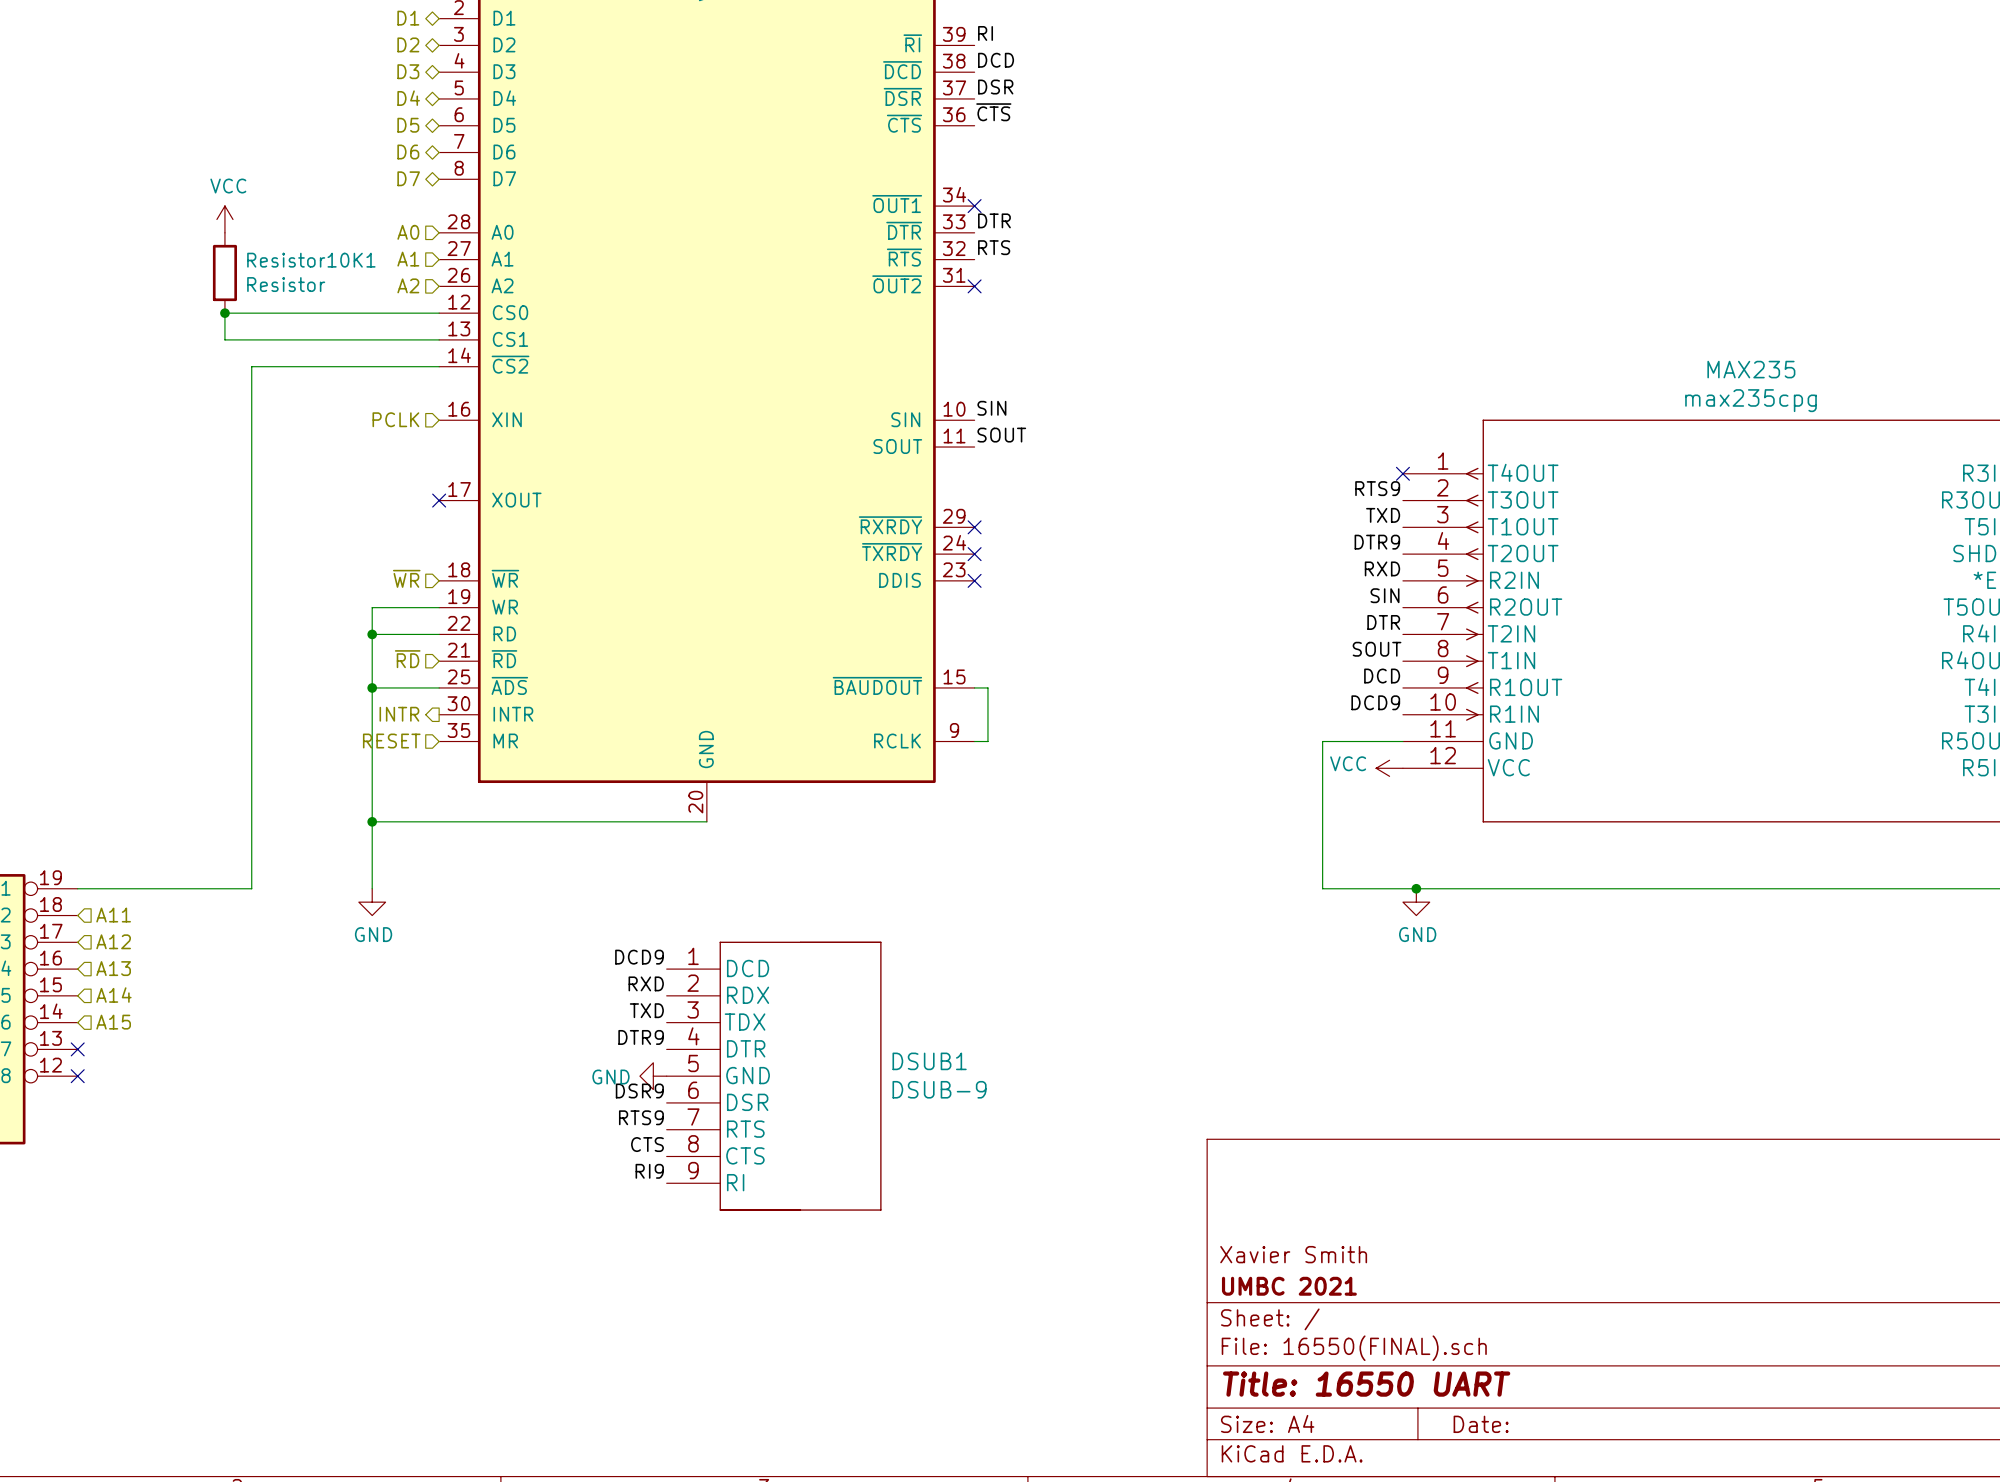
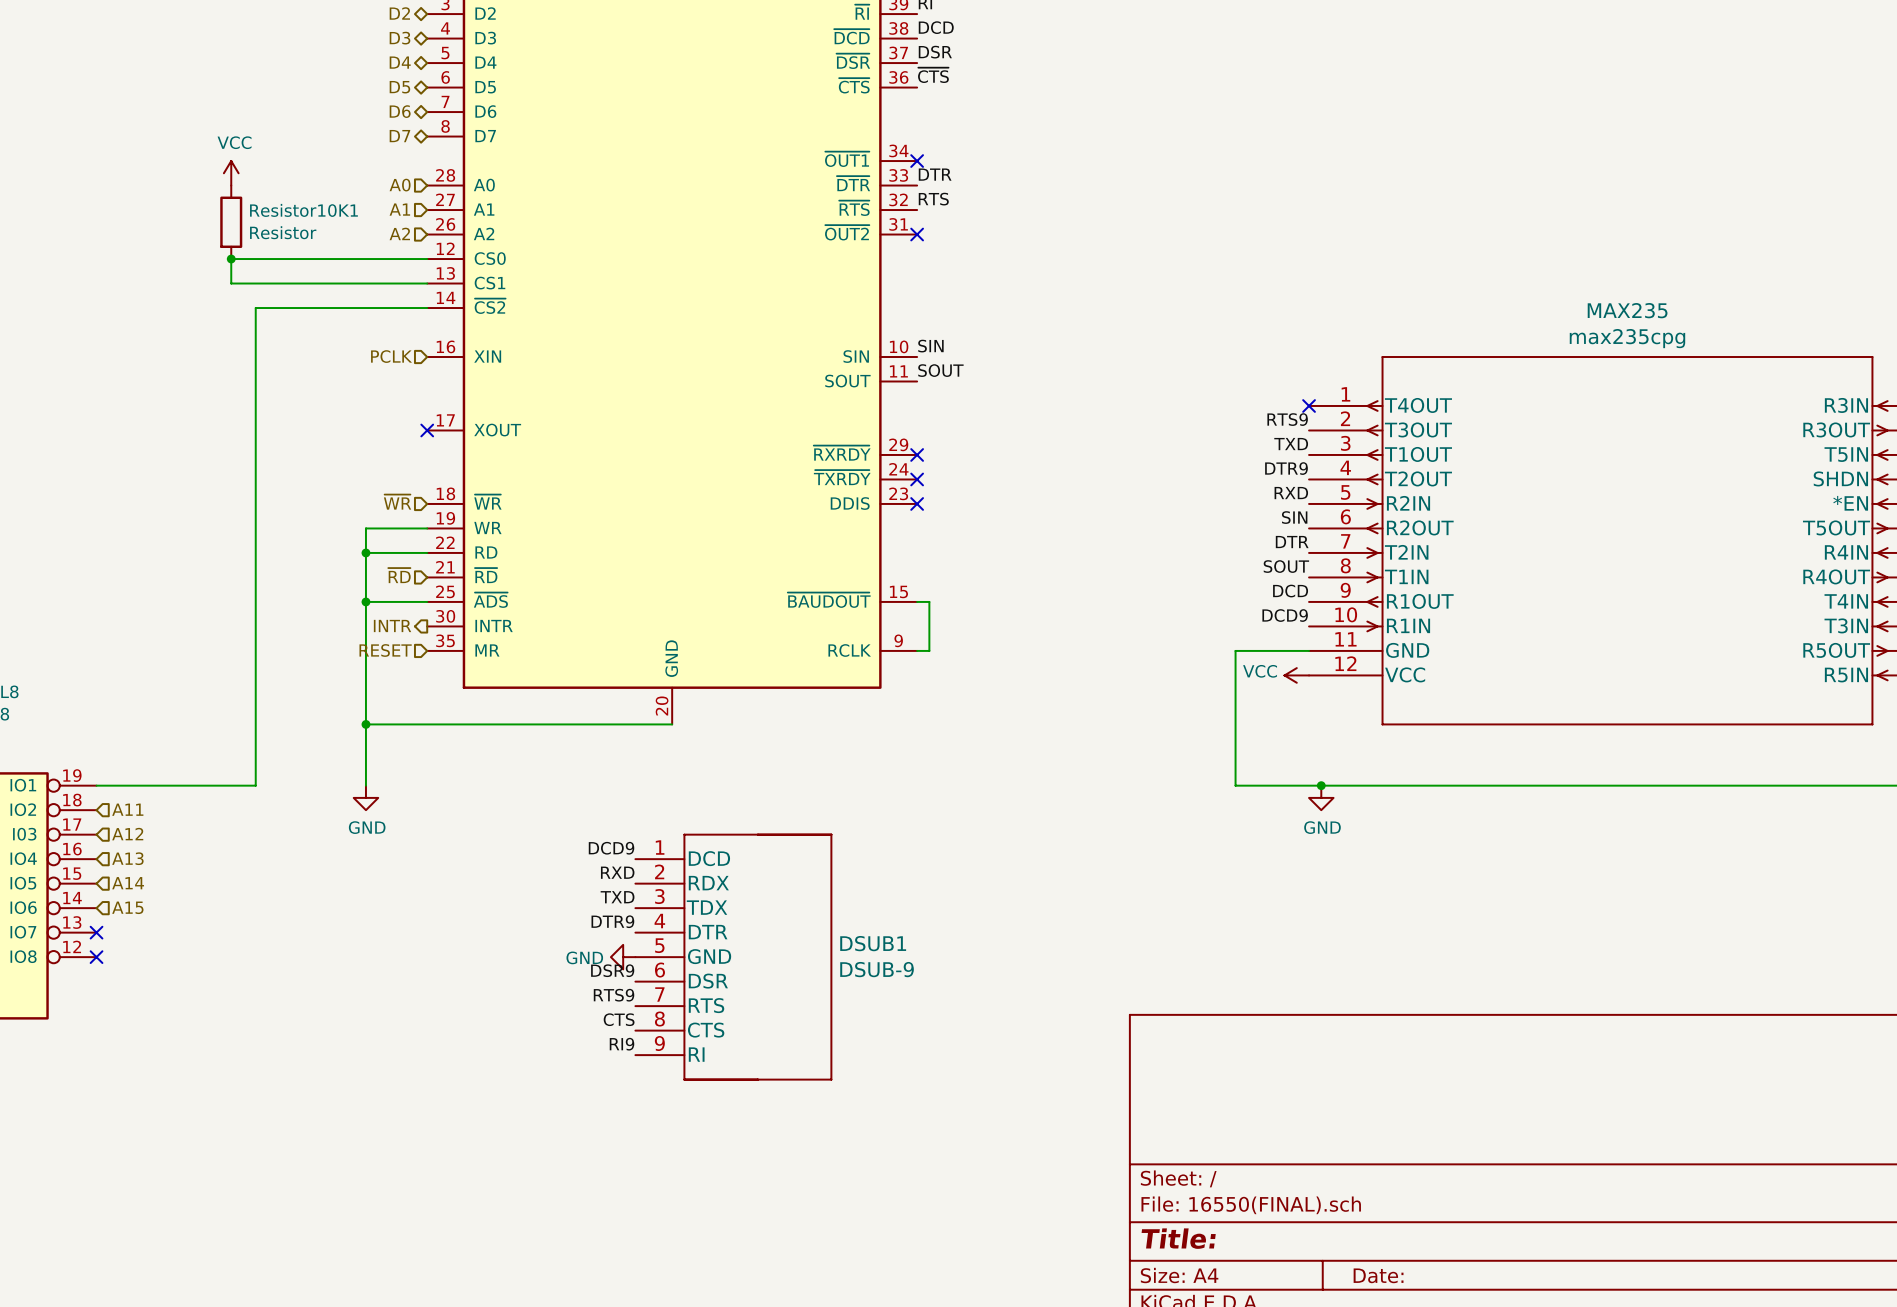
title block: Xavier Smith (1293, 1254) -> none
title block: UMBC 2021 (1289, 1286) -> none
title block: Title: 16550 UART (1366, 1384) -> Title: (1178, 1238)

